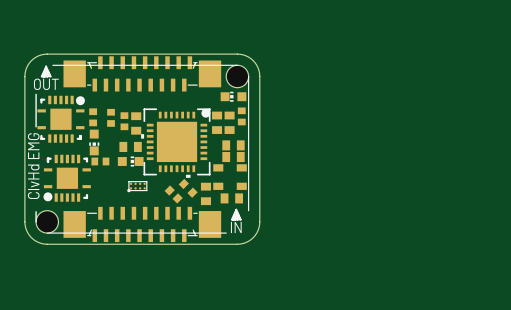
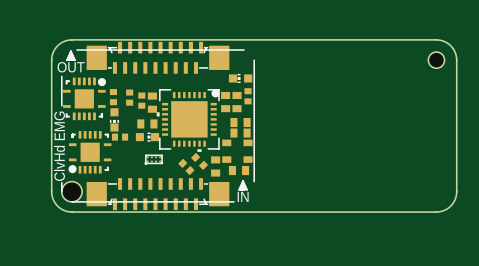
board edge: (237, 54) (245, 55) (253, 60) (258, 67) (259, 76) (259, 224) (256, 233) (251, 239) (237, 244) -> (244, 39) (439, 40) (446, 42) (452, 47) (456, 60) (456, 191) (455, 199) (448, 207) (436, 212) (244, 212)
hole: (237, 76) -> none
hole: none -> (436, 60)

